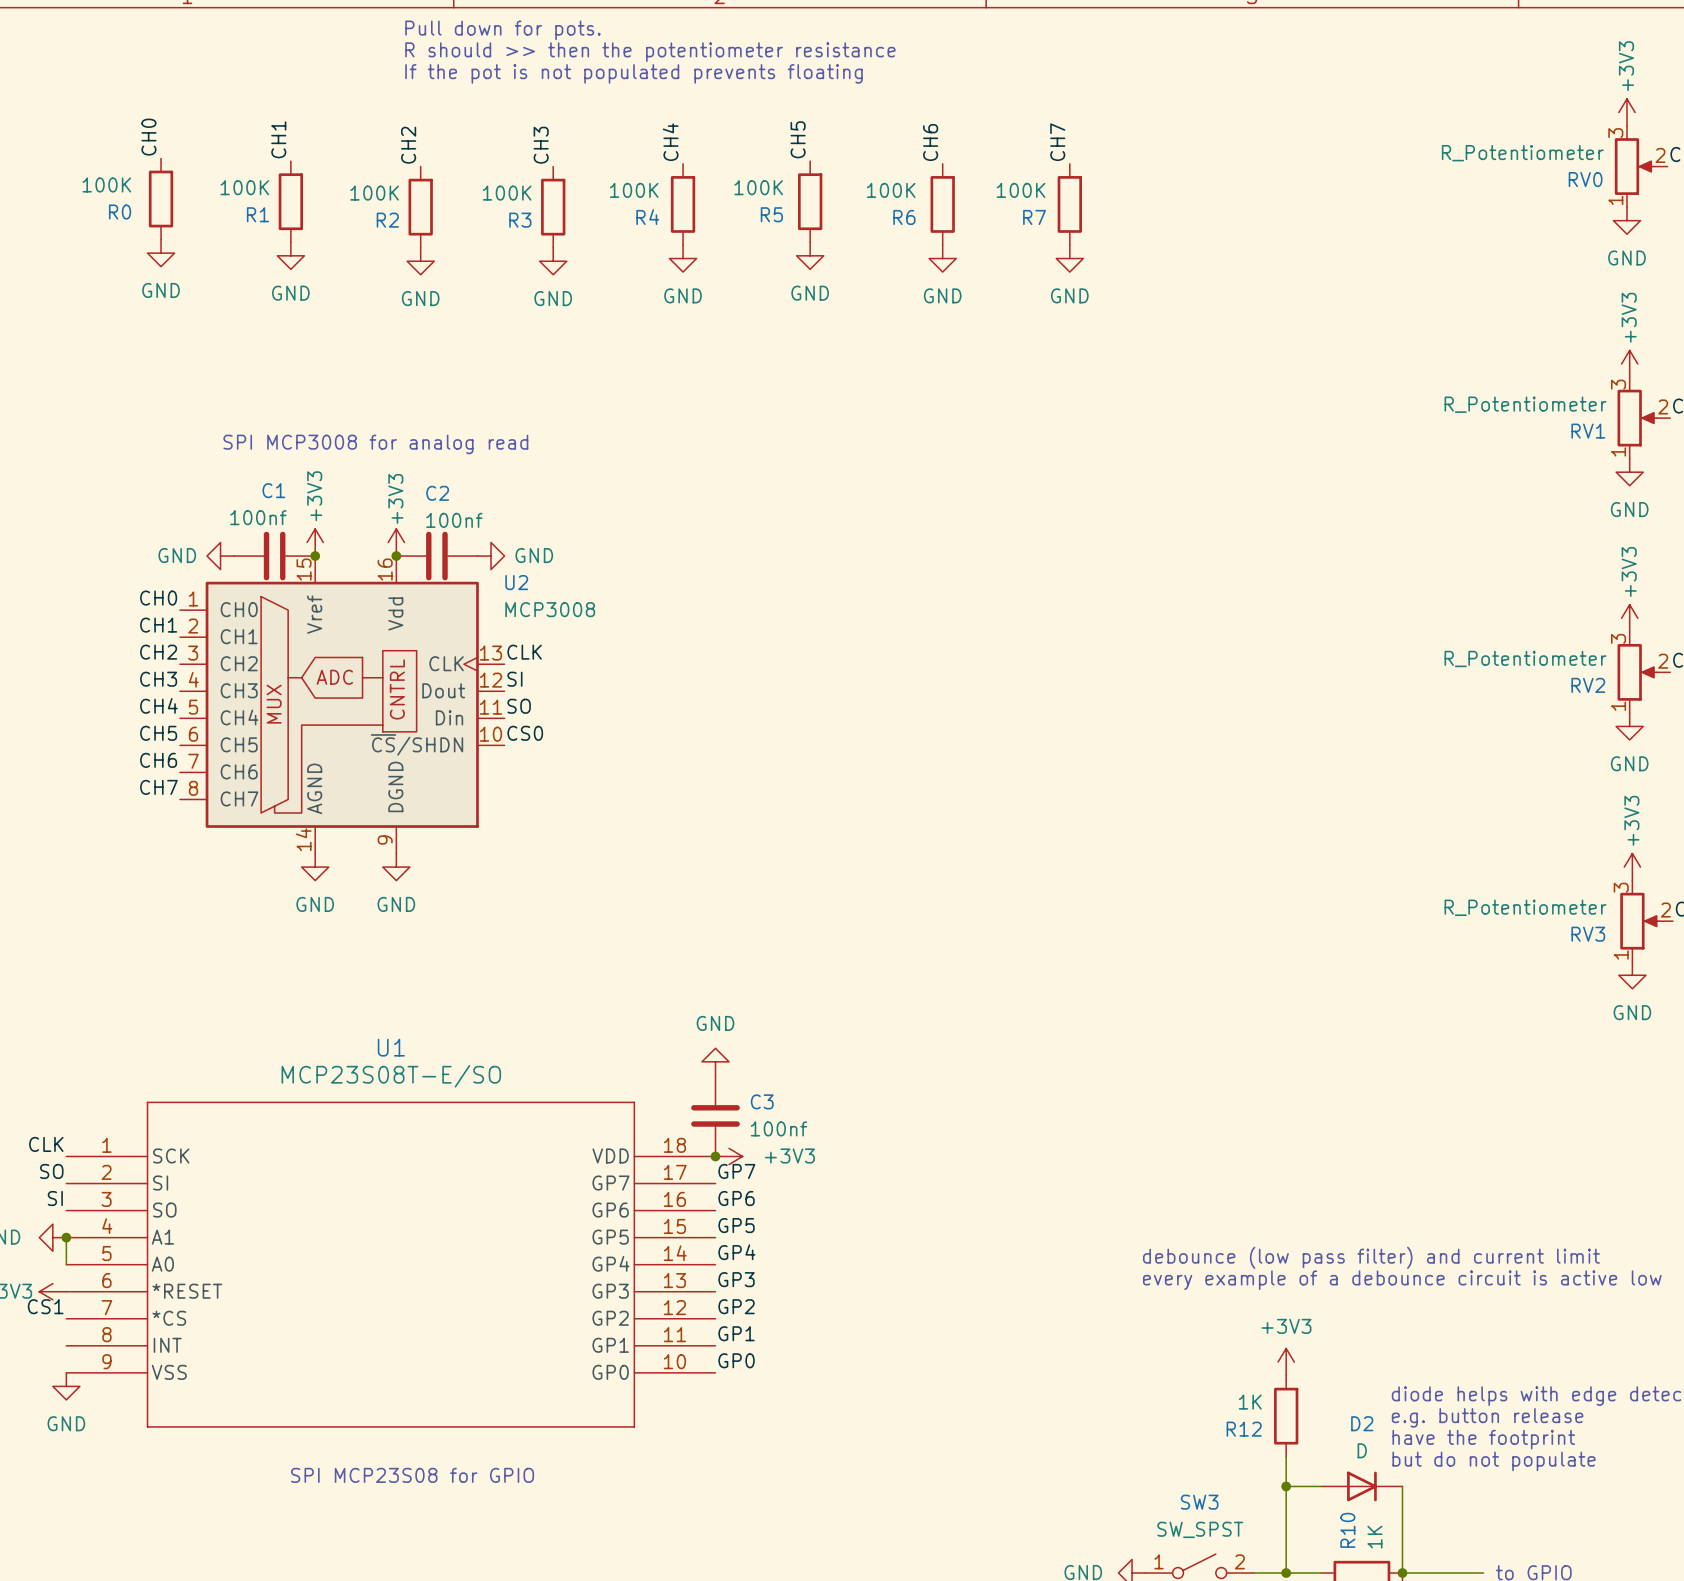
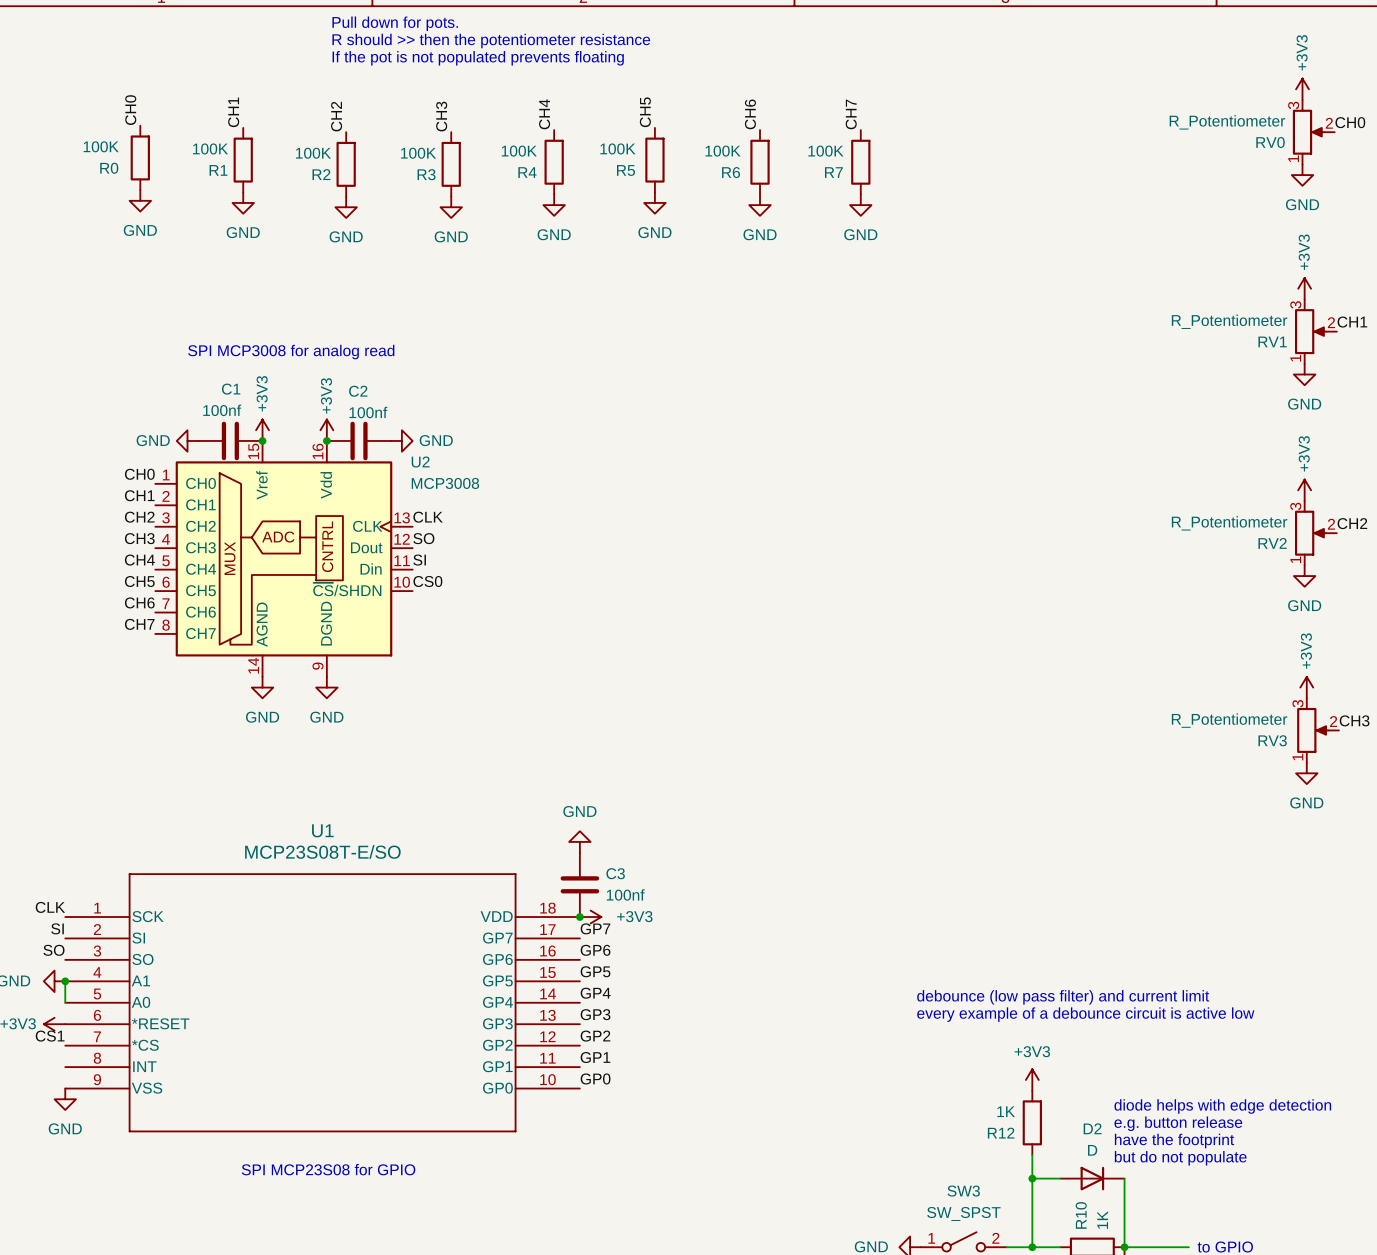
label: SI (514, 679) -> SO (423, 538)
label: SO (519, 706) -> SI (419, 560)
label: SO (51, 1171) -> SI (57, 928)
label: SI (55, 1198) -> SO (53, 950)

